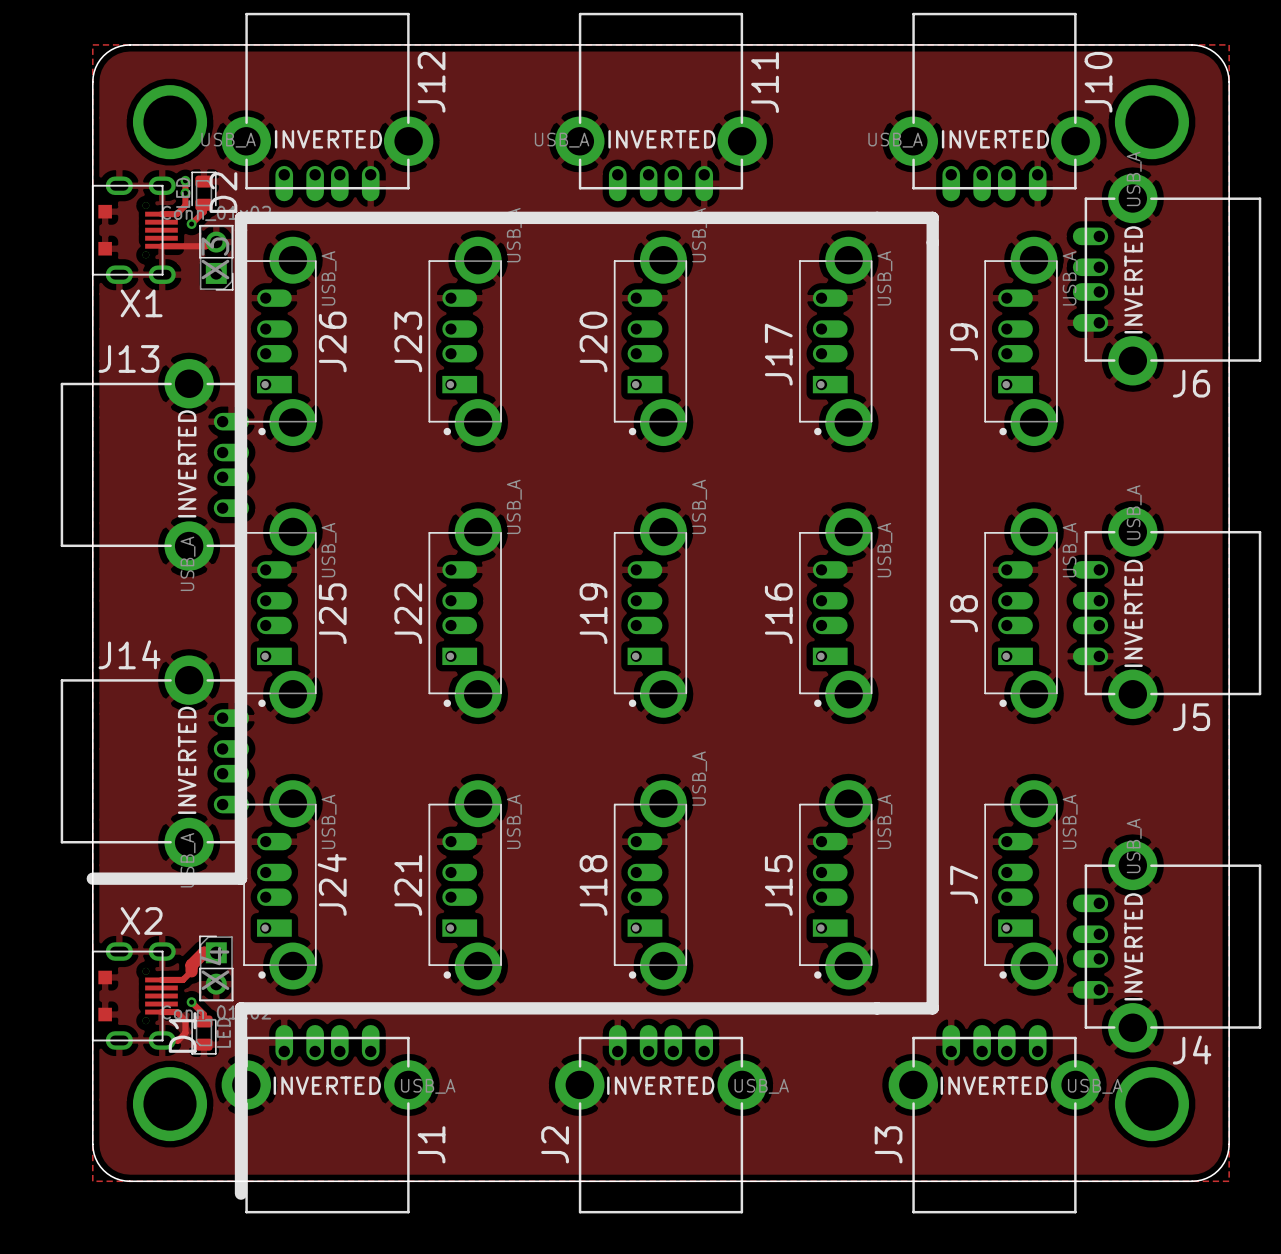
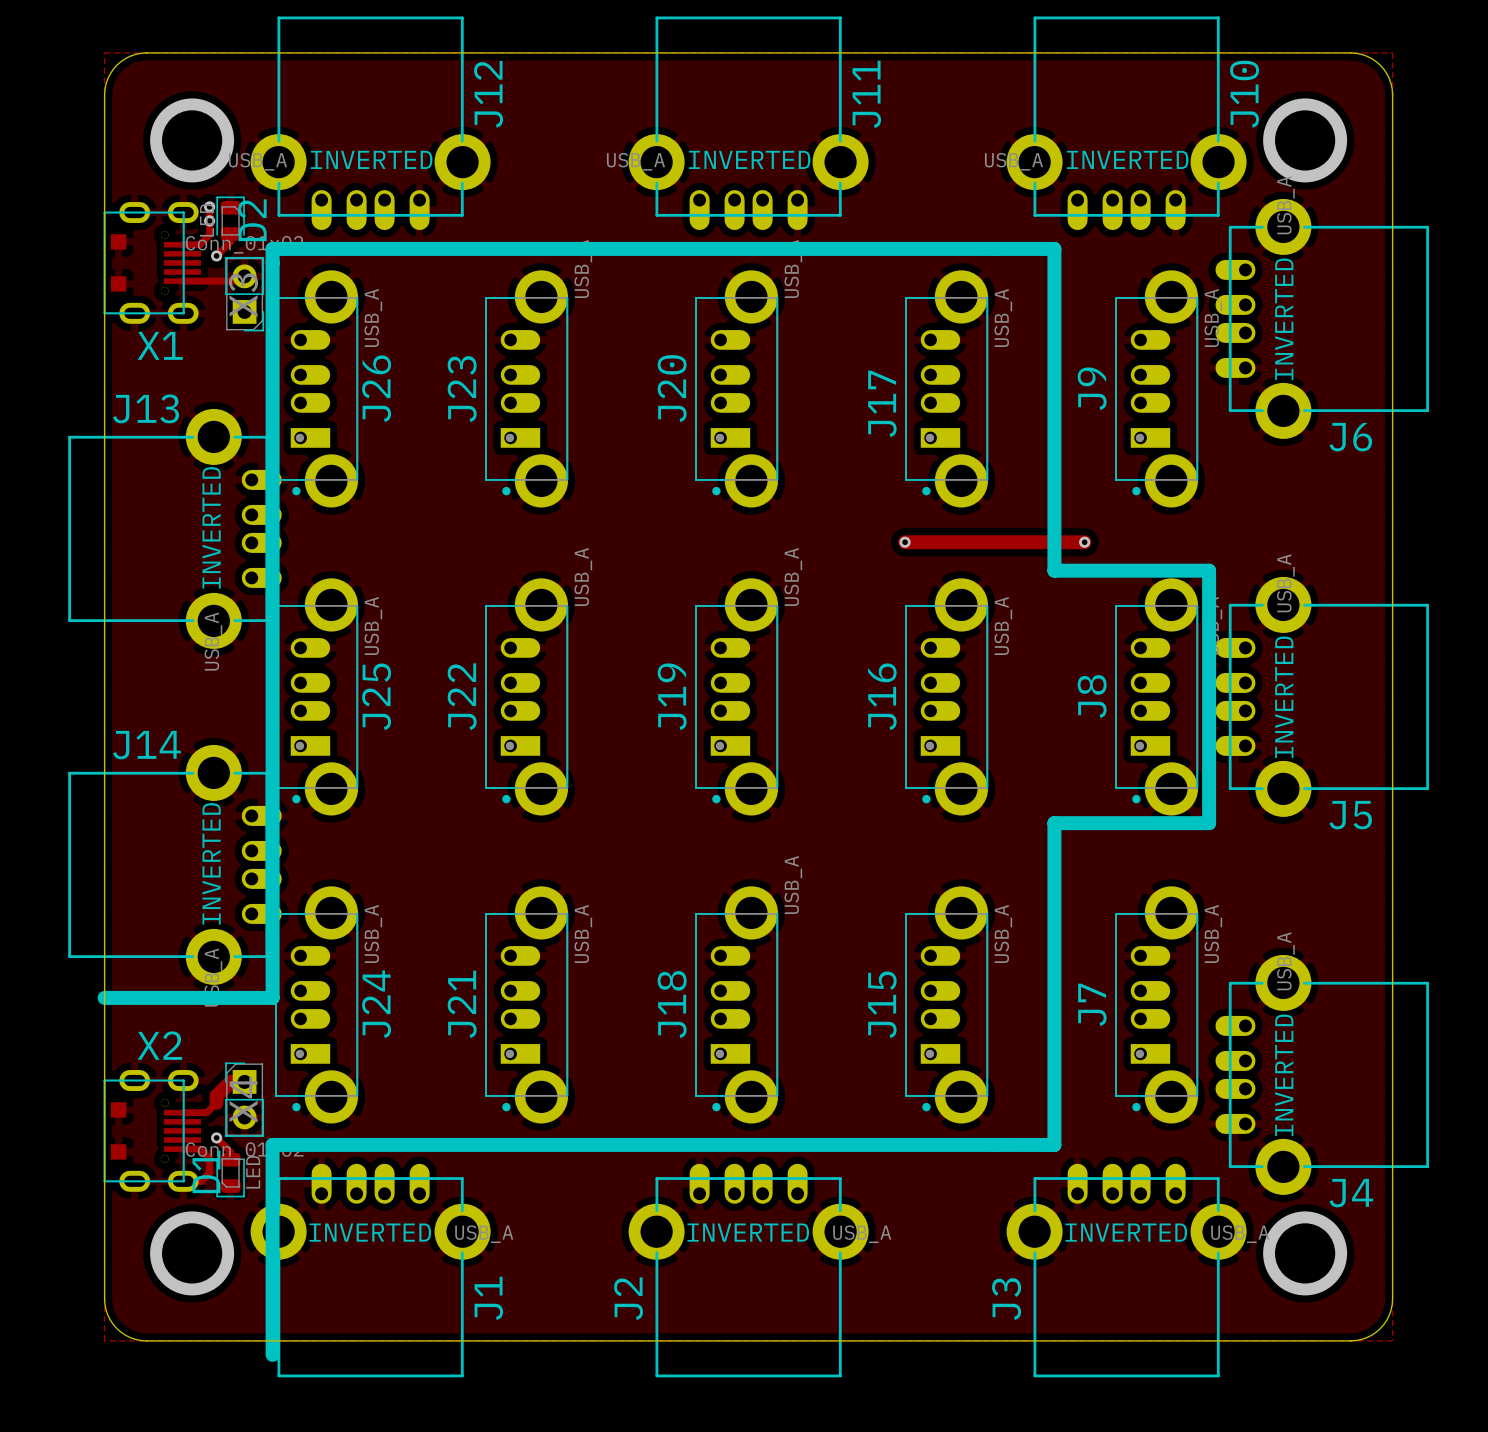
line: (930, 217) (932, 217) (932, 1008) (877, 1008) -> (1054, 248) (1054, 570) (1209, 570) (1209, 823) (1054, 823) (1054, 1144) (993, 1144)
track: none -> (905, 542) (1084, 542)
via: none -> (905, 542)
via: none -> (1084, 542)

